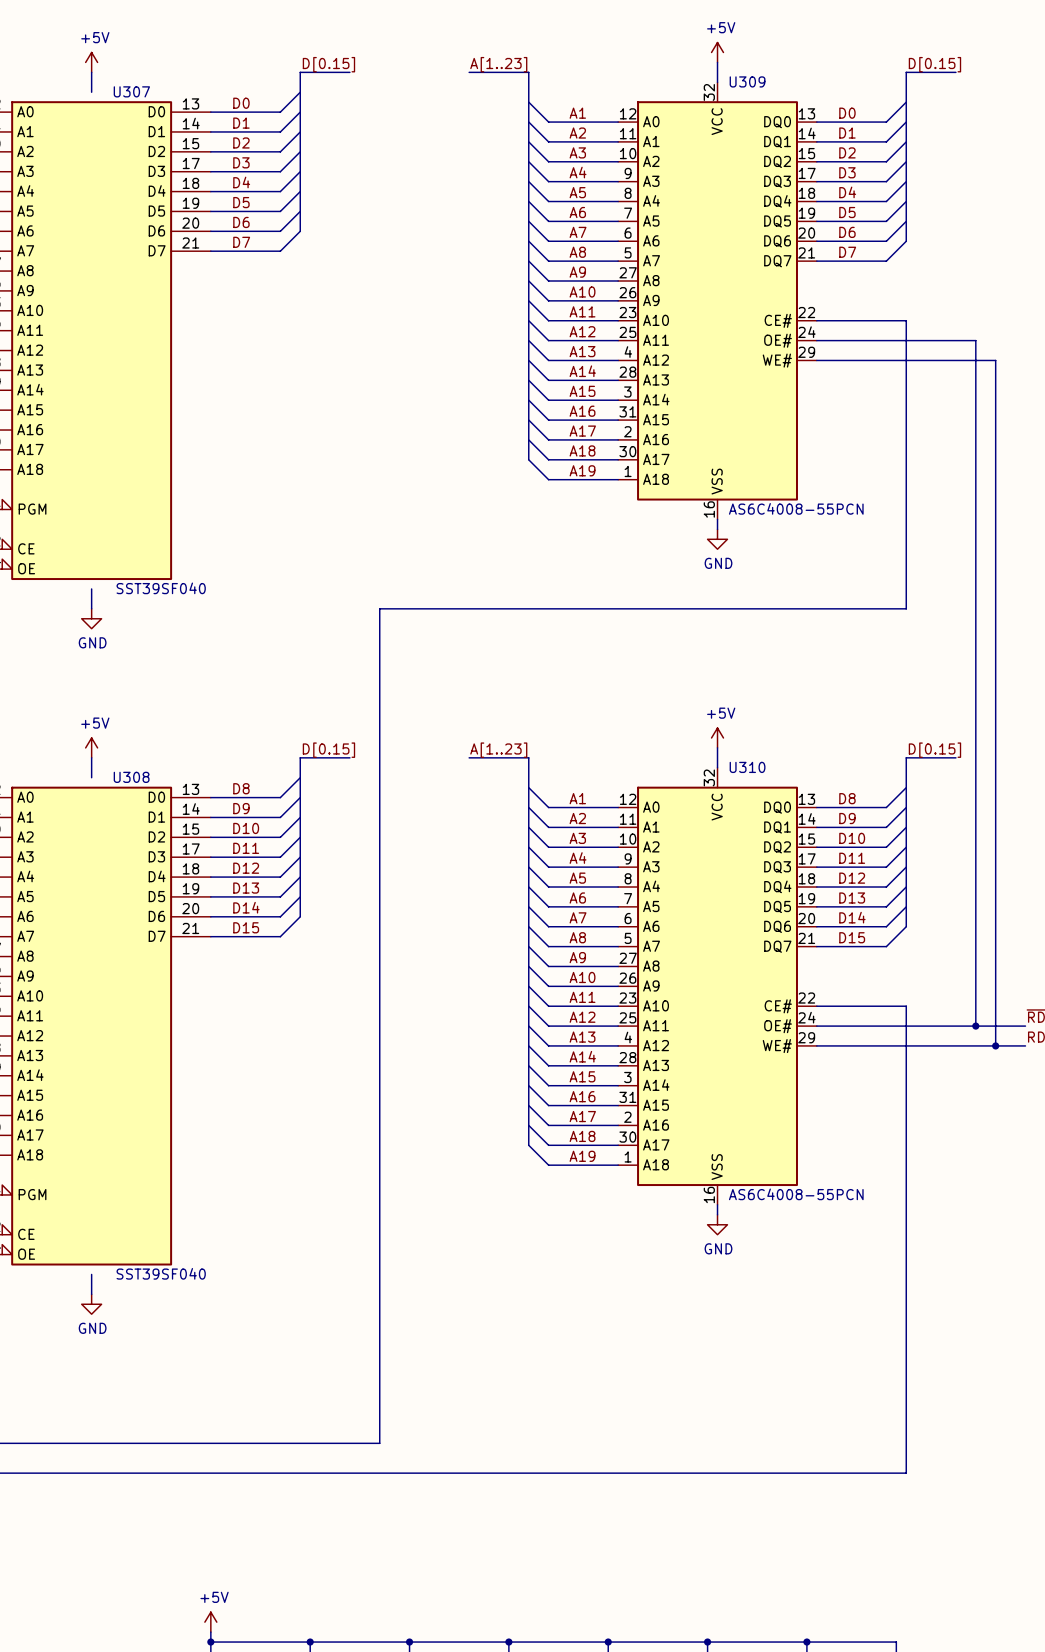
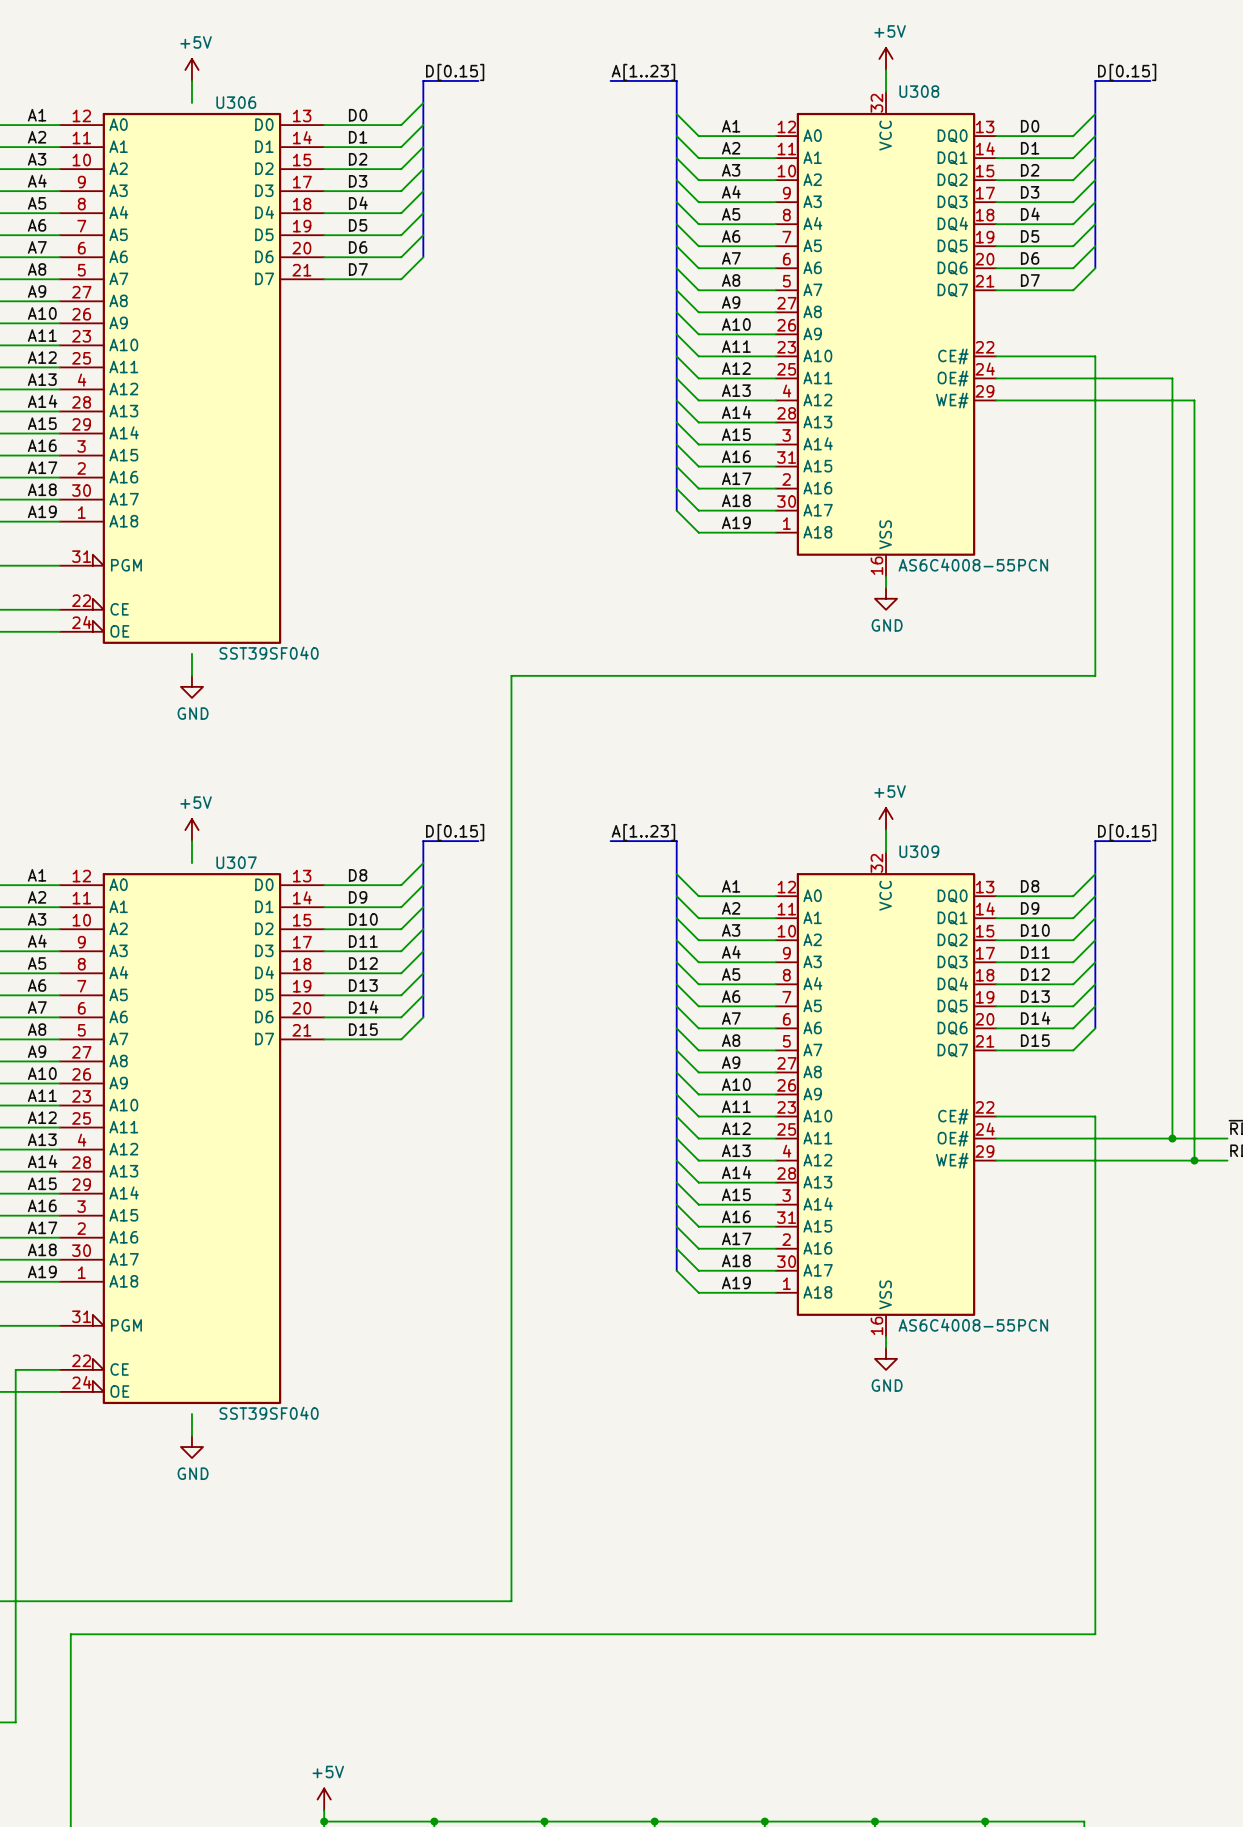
U309 name: U309 (747, 81) -> U308 (919, 91)
U307 name: U307 (131, 91) -> U306 (236, 102)
U310 name: U310 (747, 767) -> U309 (919, 851)
U308 name: U308 (131, 777) -> U307 (236, 862)

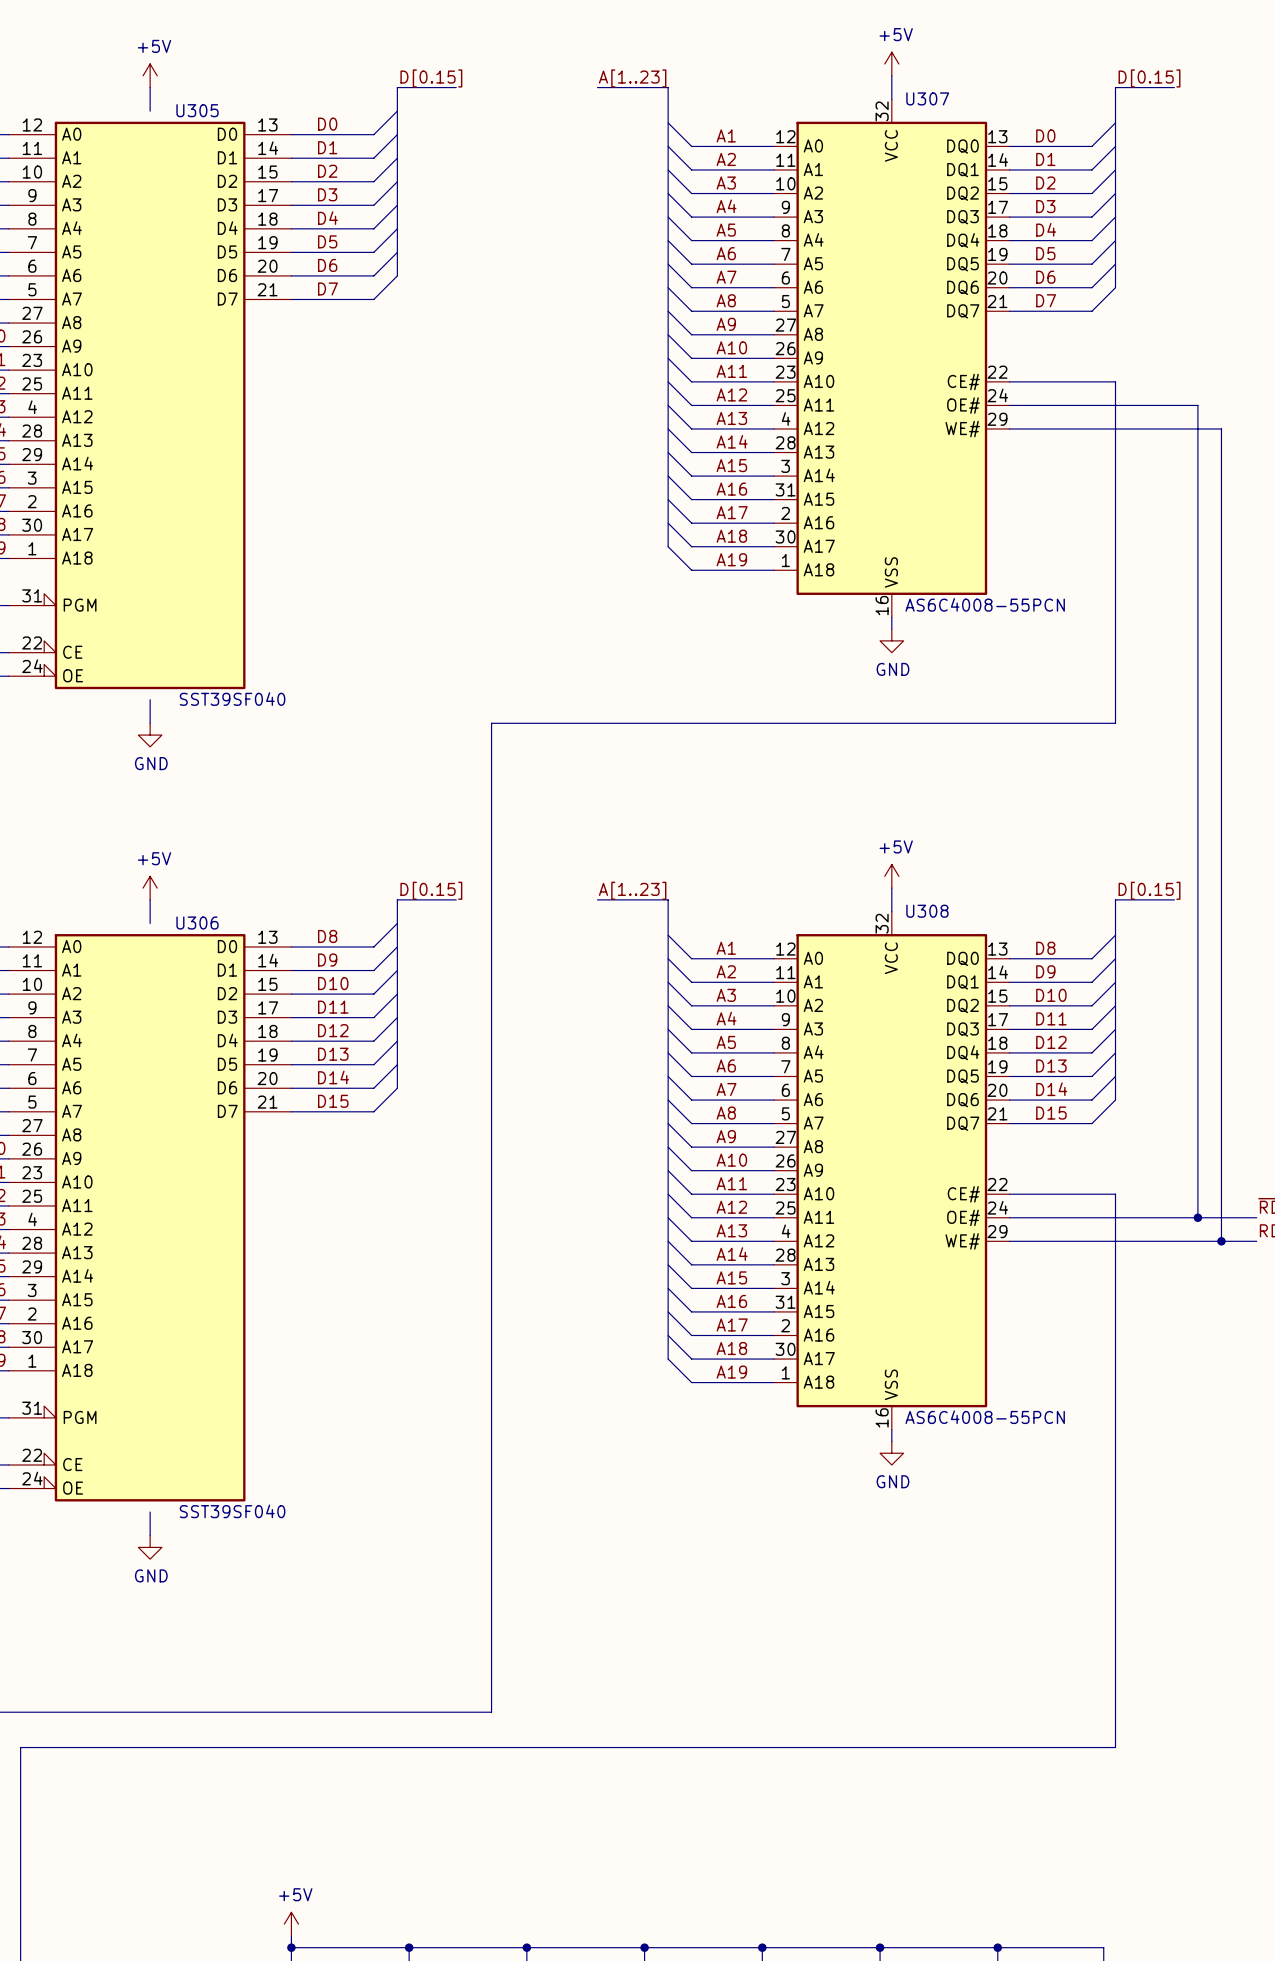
U308 name: U308 (919, 91) -> U307 (927, 98)
U306 name: U306 (236, 102) -> U305 (197, 110)
U309 name: U309 (919, 851) -> U308 (927, 911)
U307 name: U307 (236, 862) -> U306 (197, 923)

